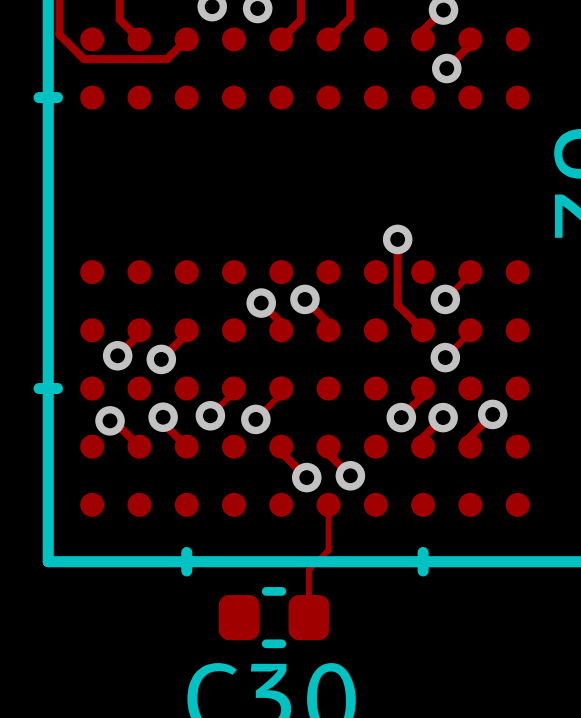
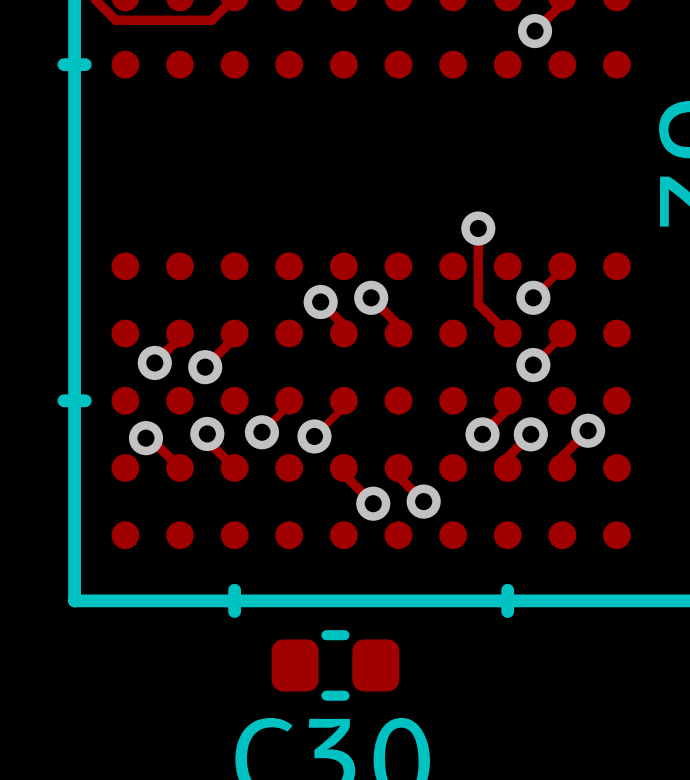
track: (328, 504) (328, 550) (308, 569) (308, 617) -> none

